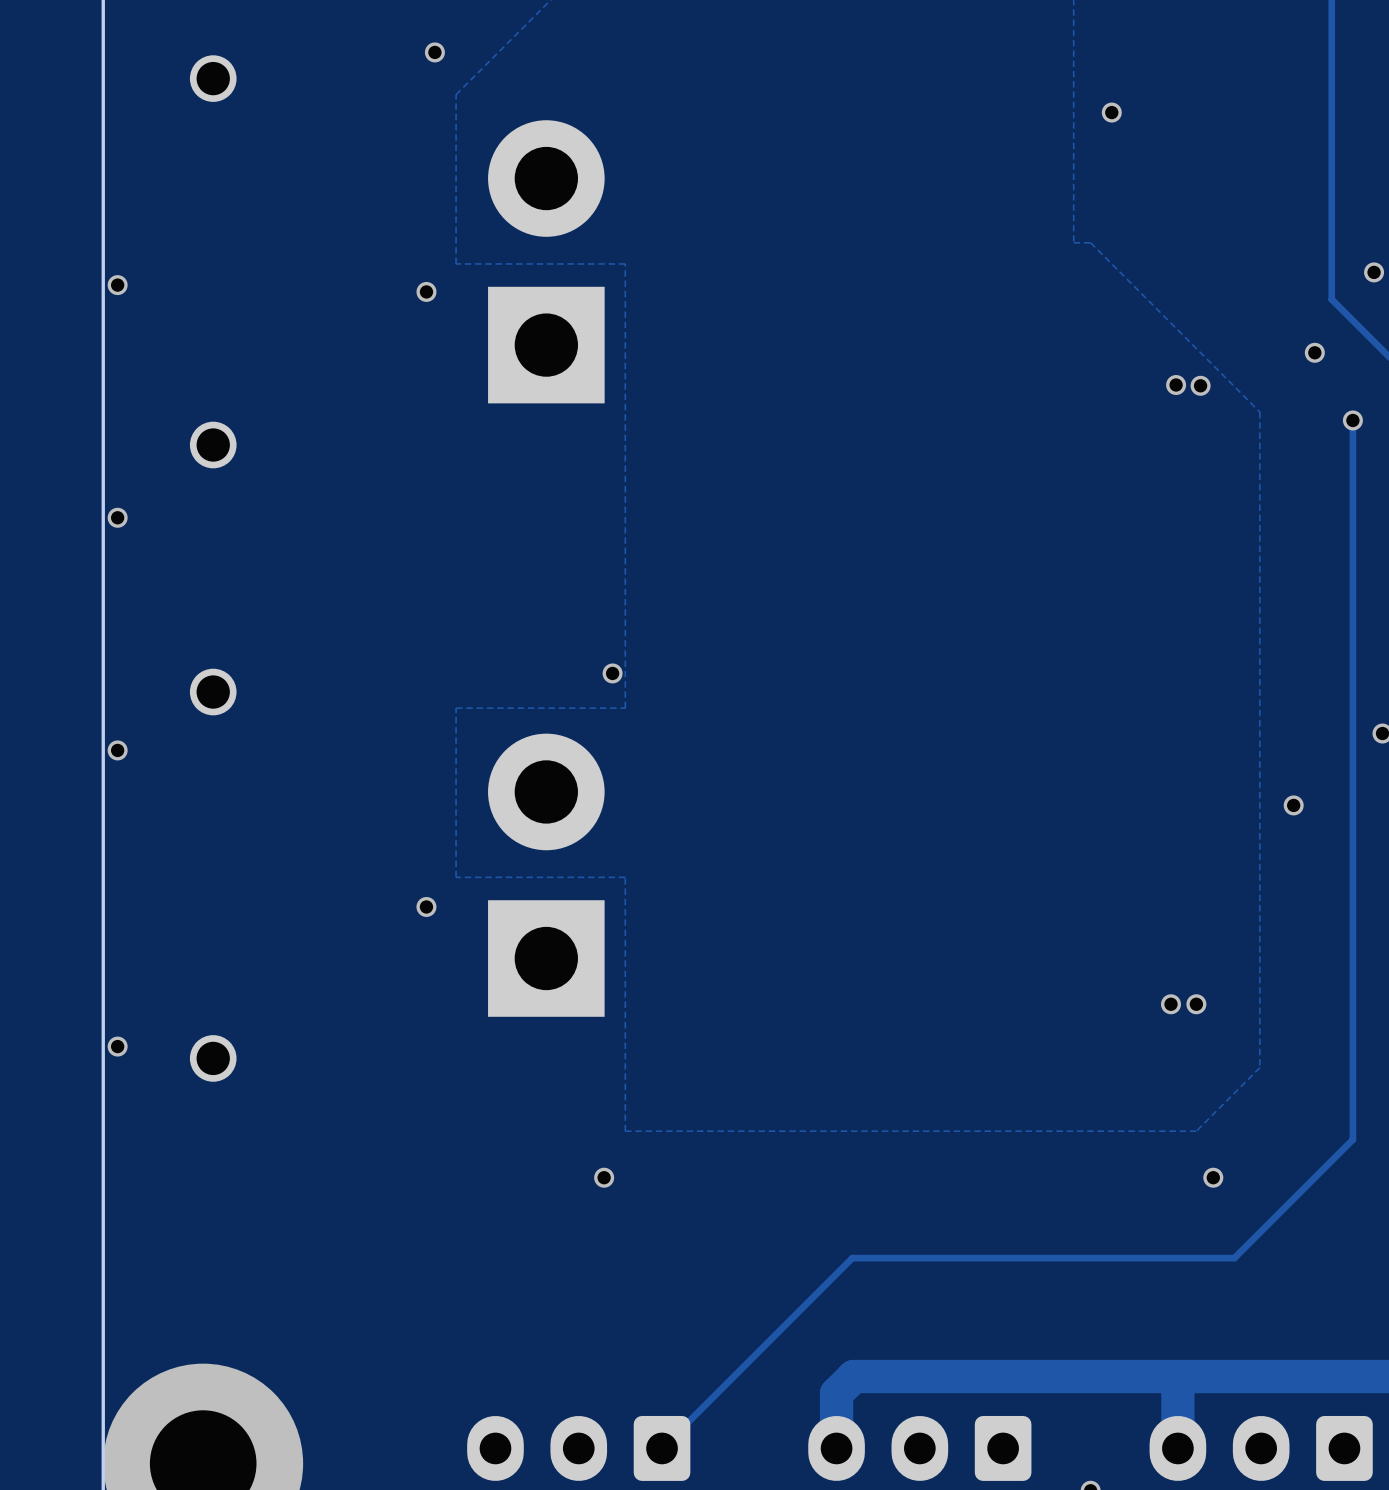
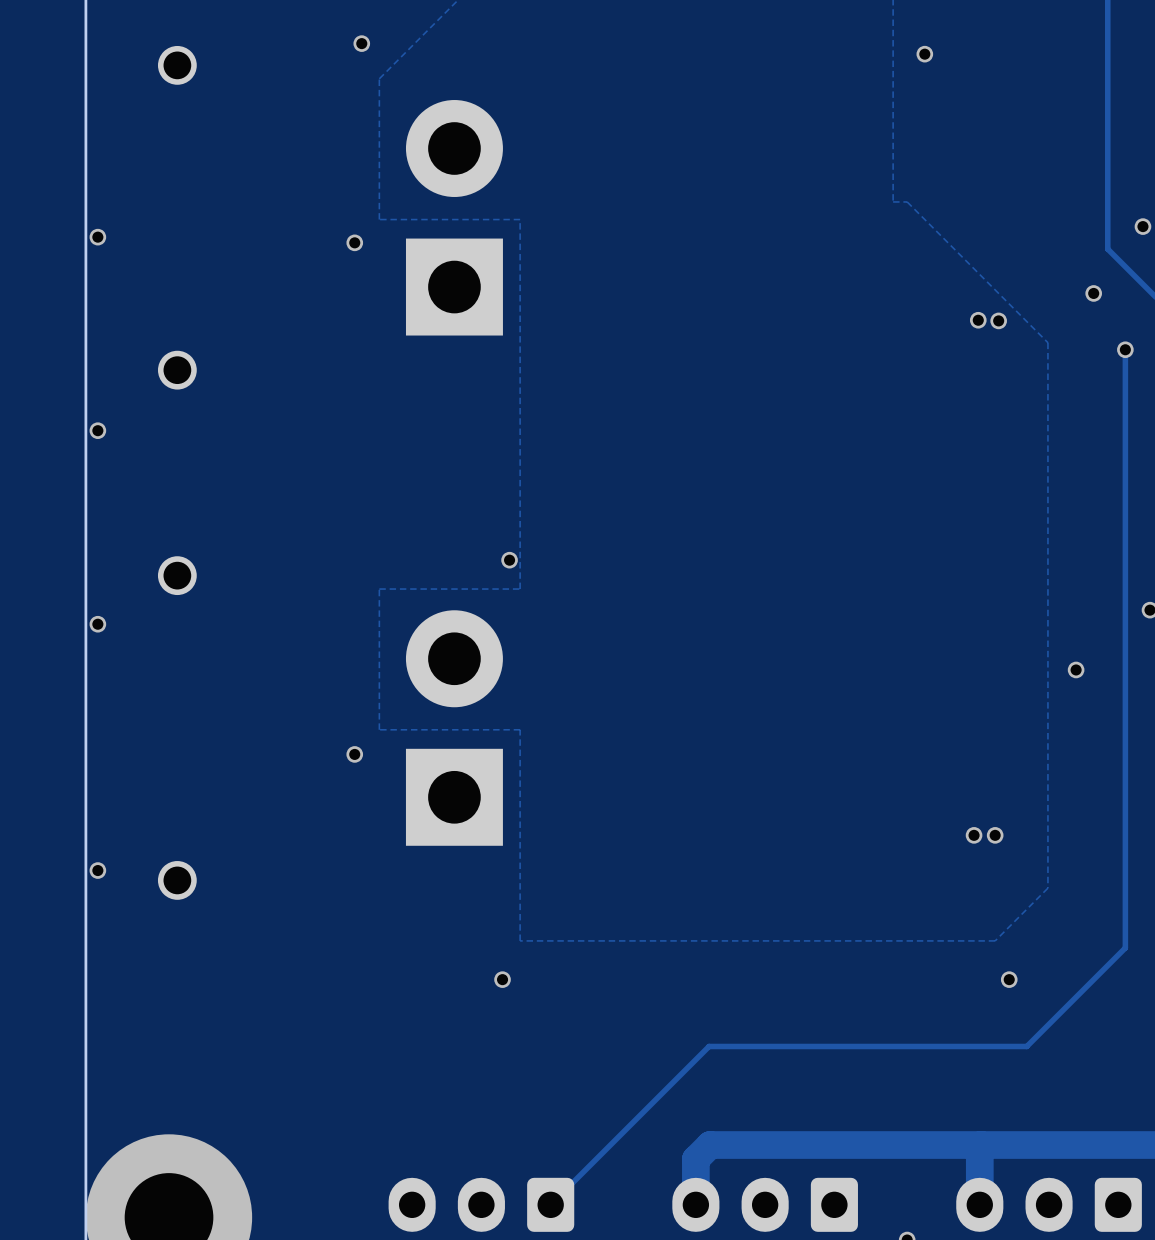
via position: (1111, 112) -> (924, 54)

